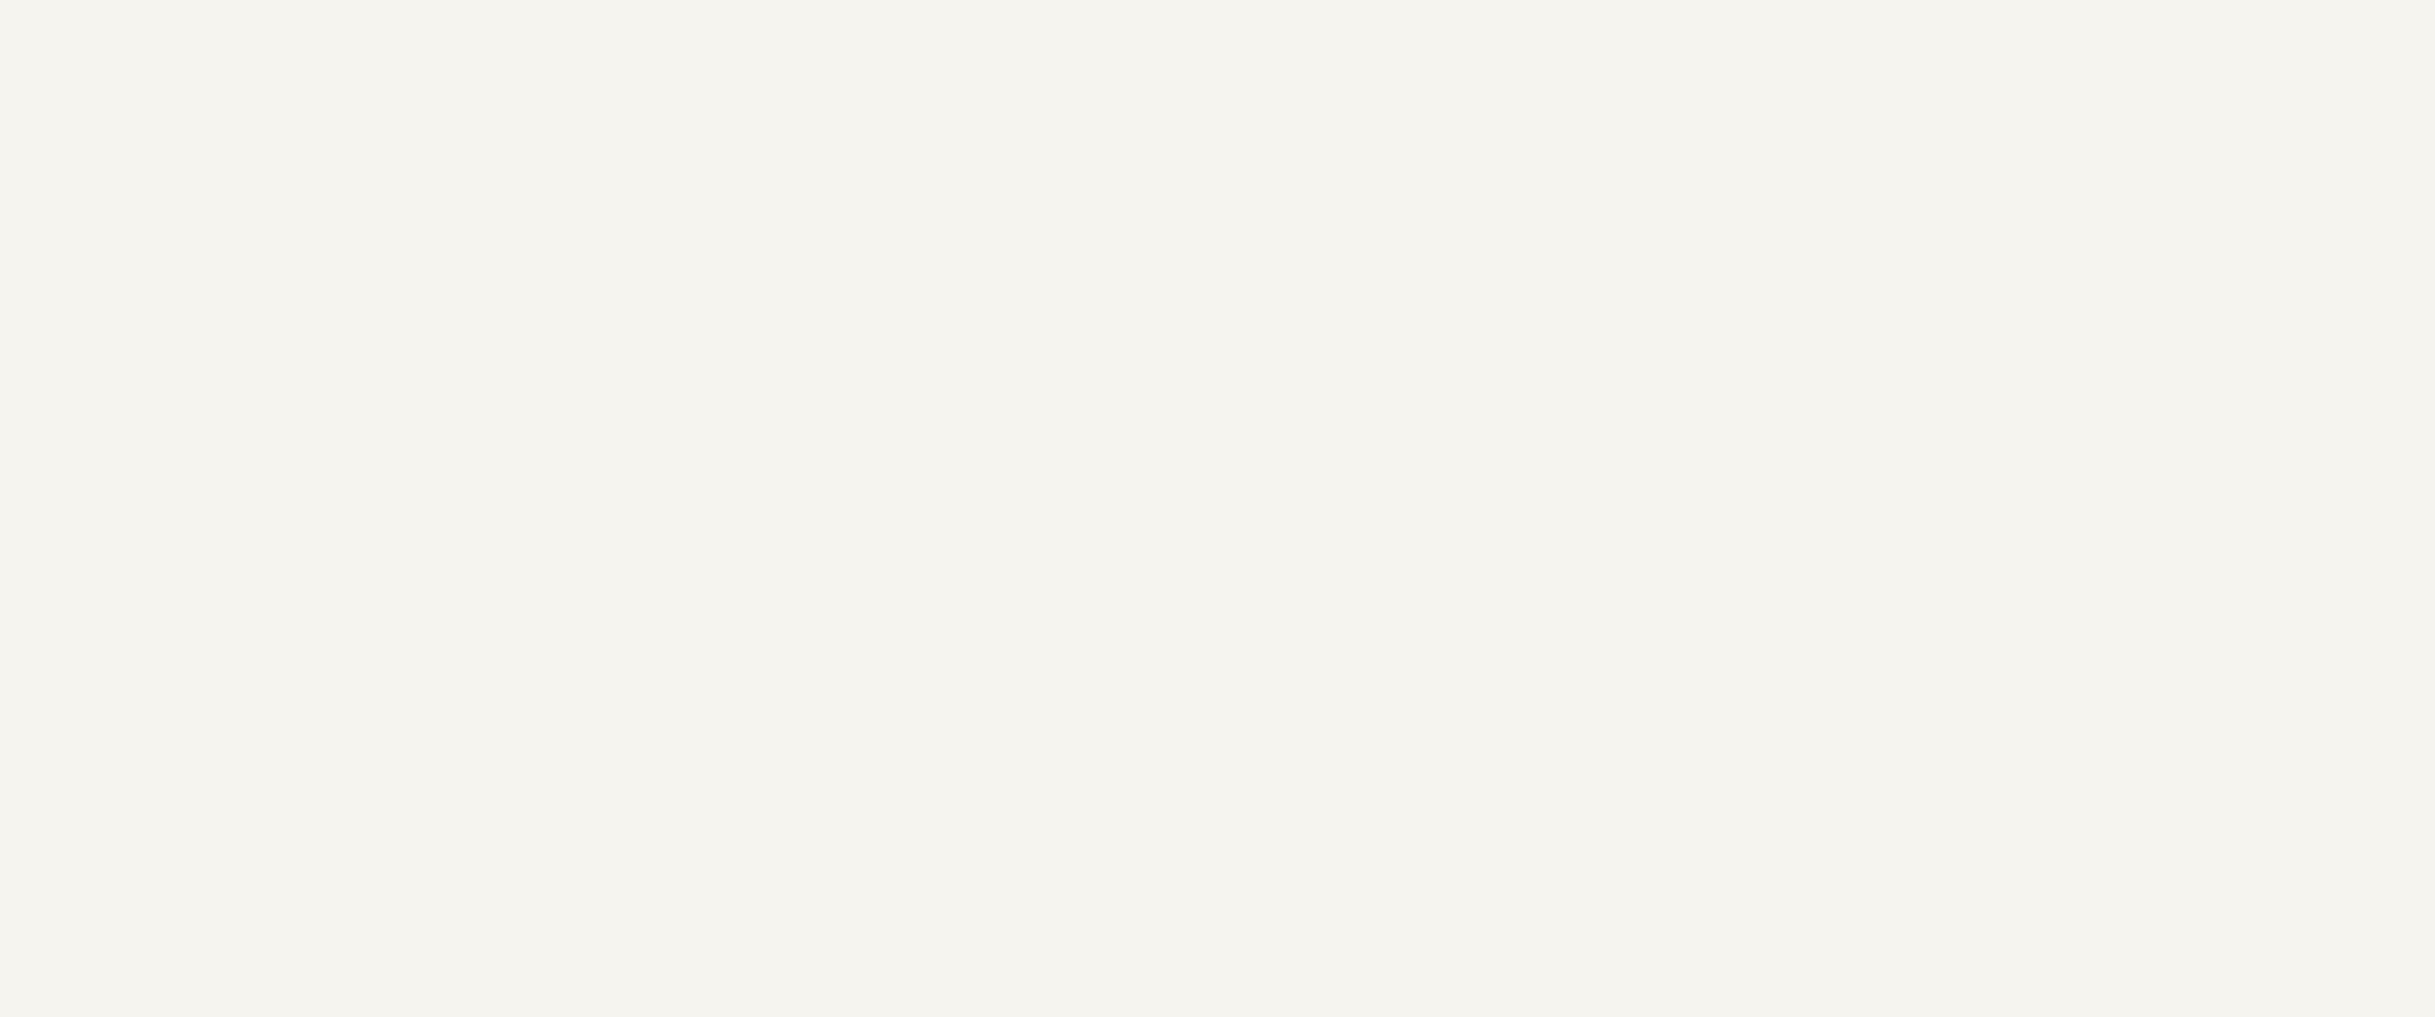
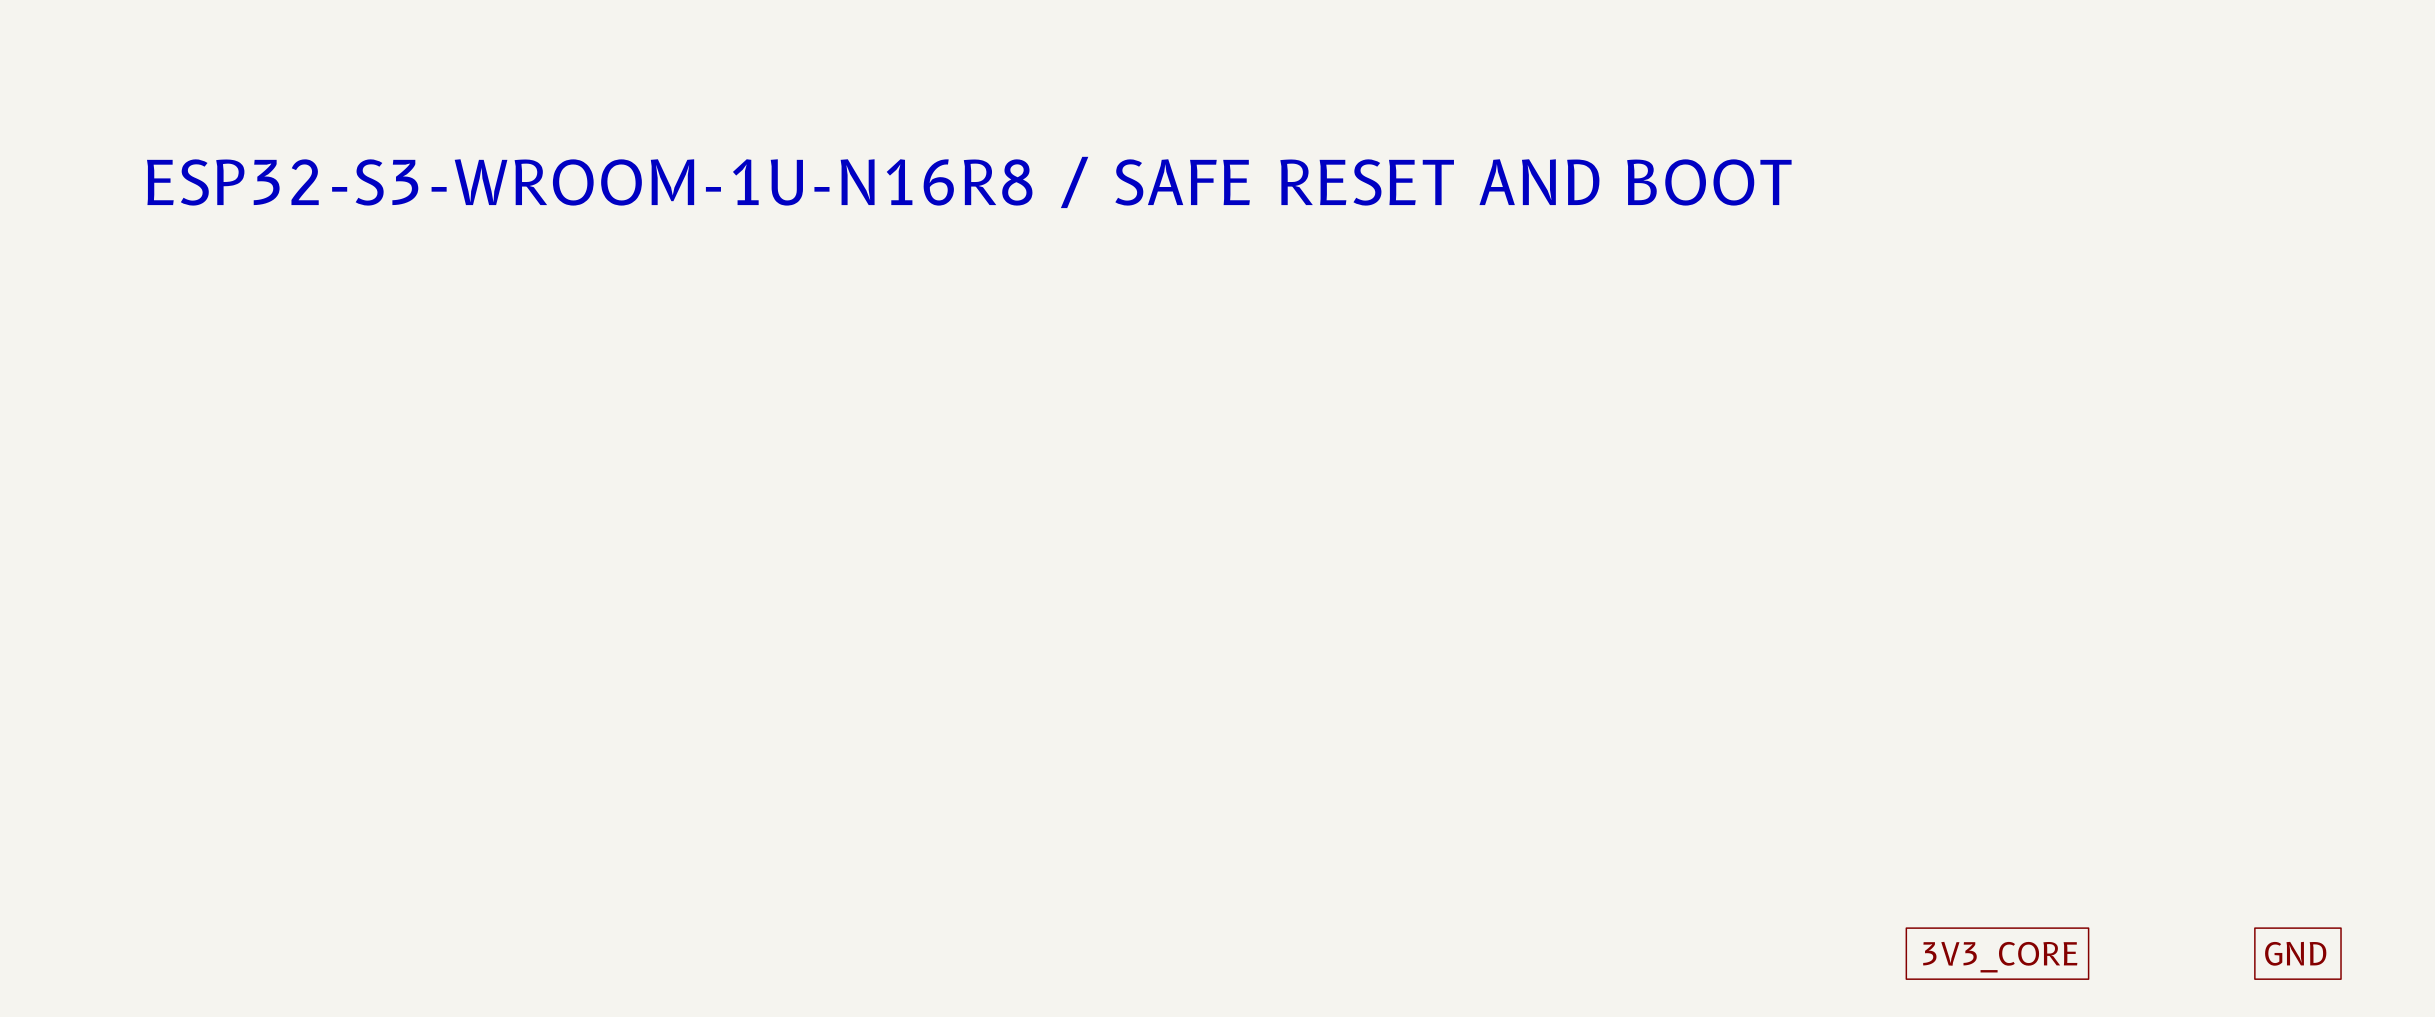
text: none -> ESP32-S3-WROOM-1U-N16R8 / SAFE RESET AND BOOT (969, 182)
global label: none -> GND (2295, 953)
global label: none -> 3V3_CORE (2000, 957)

